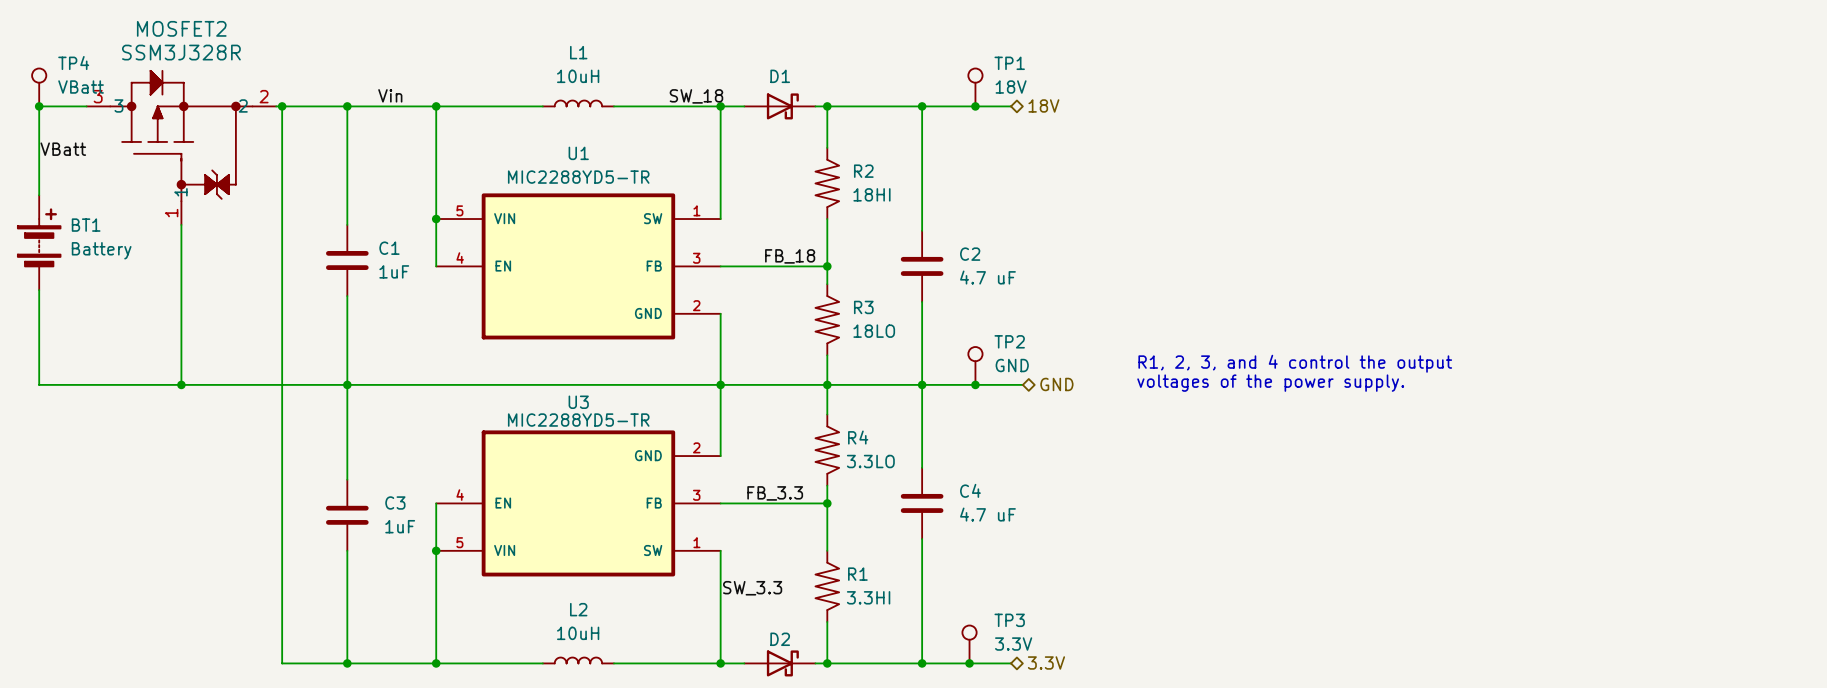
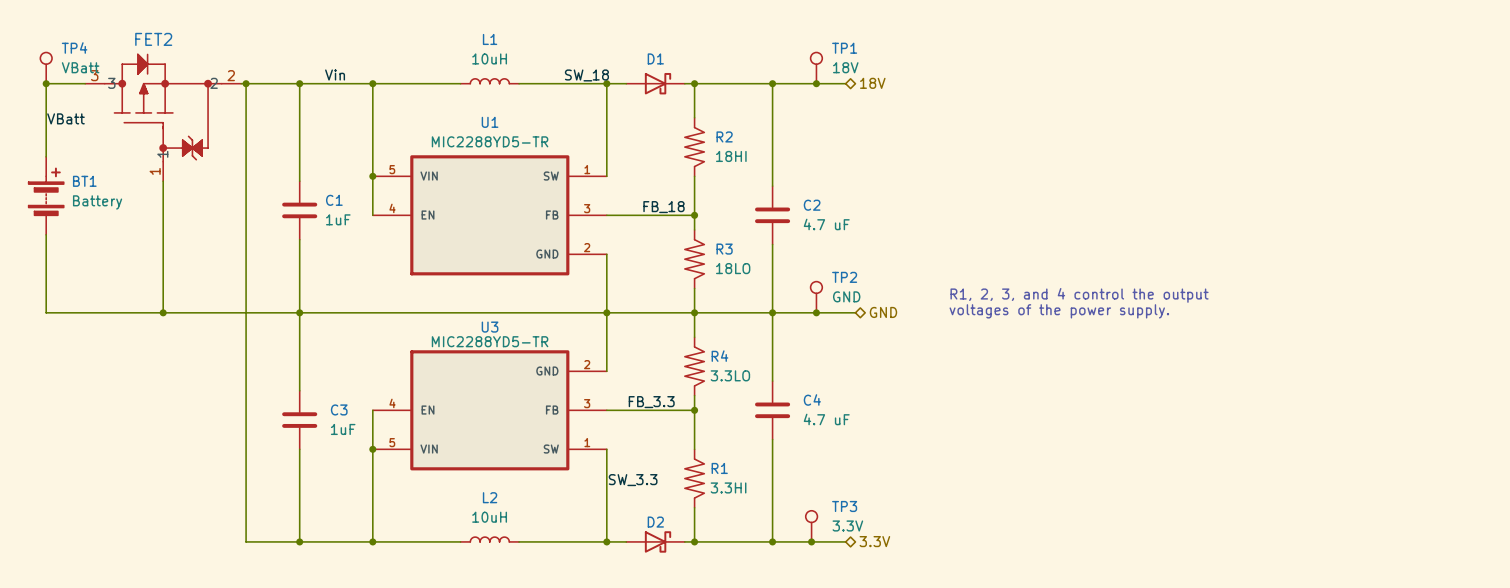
MOSFET2 name: MOSFET2 (181, 28) -> FET2 (153, 39)
MOSFET2 value: SSM3J328R (181, 52) -> none

